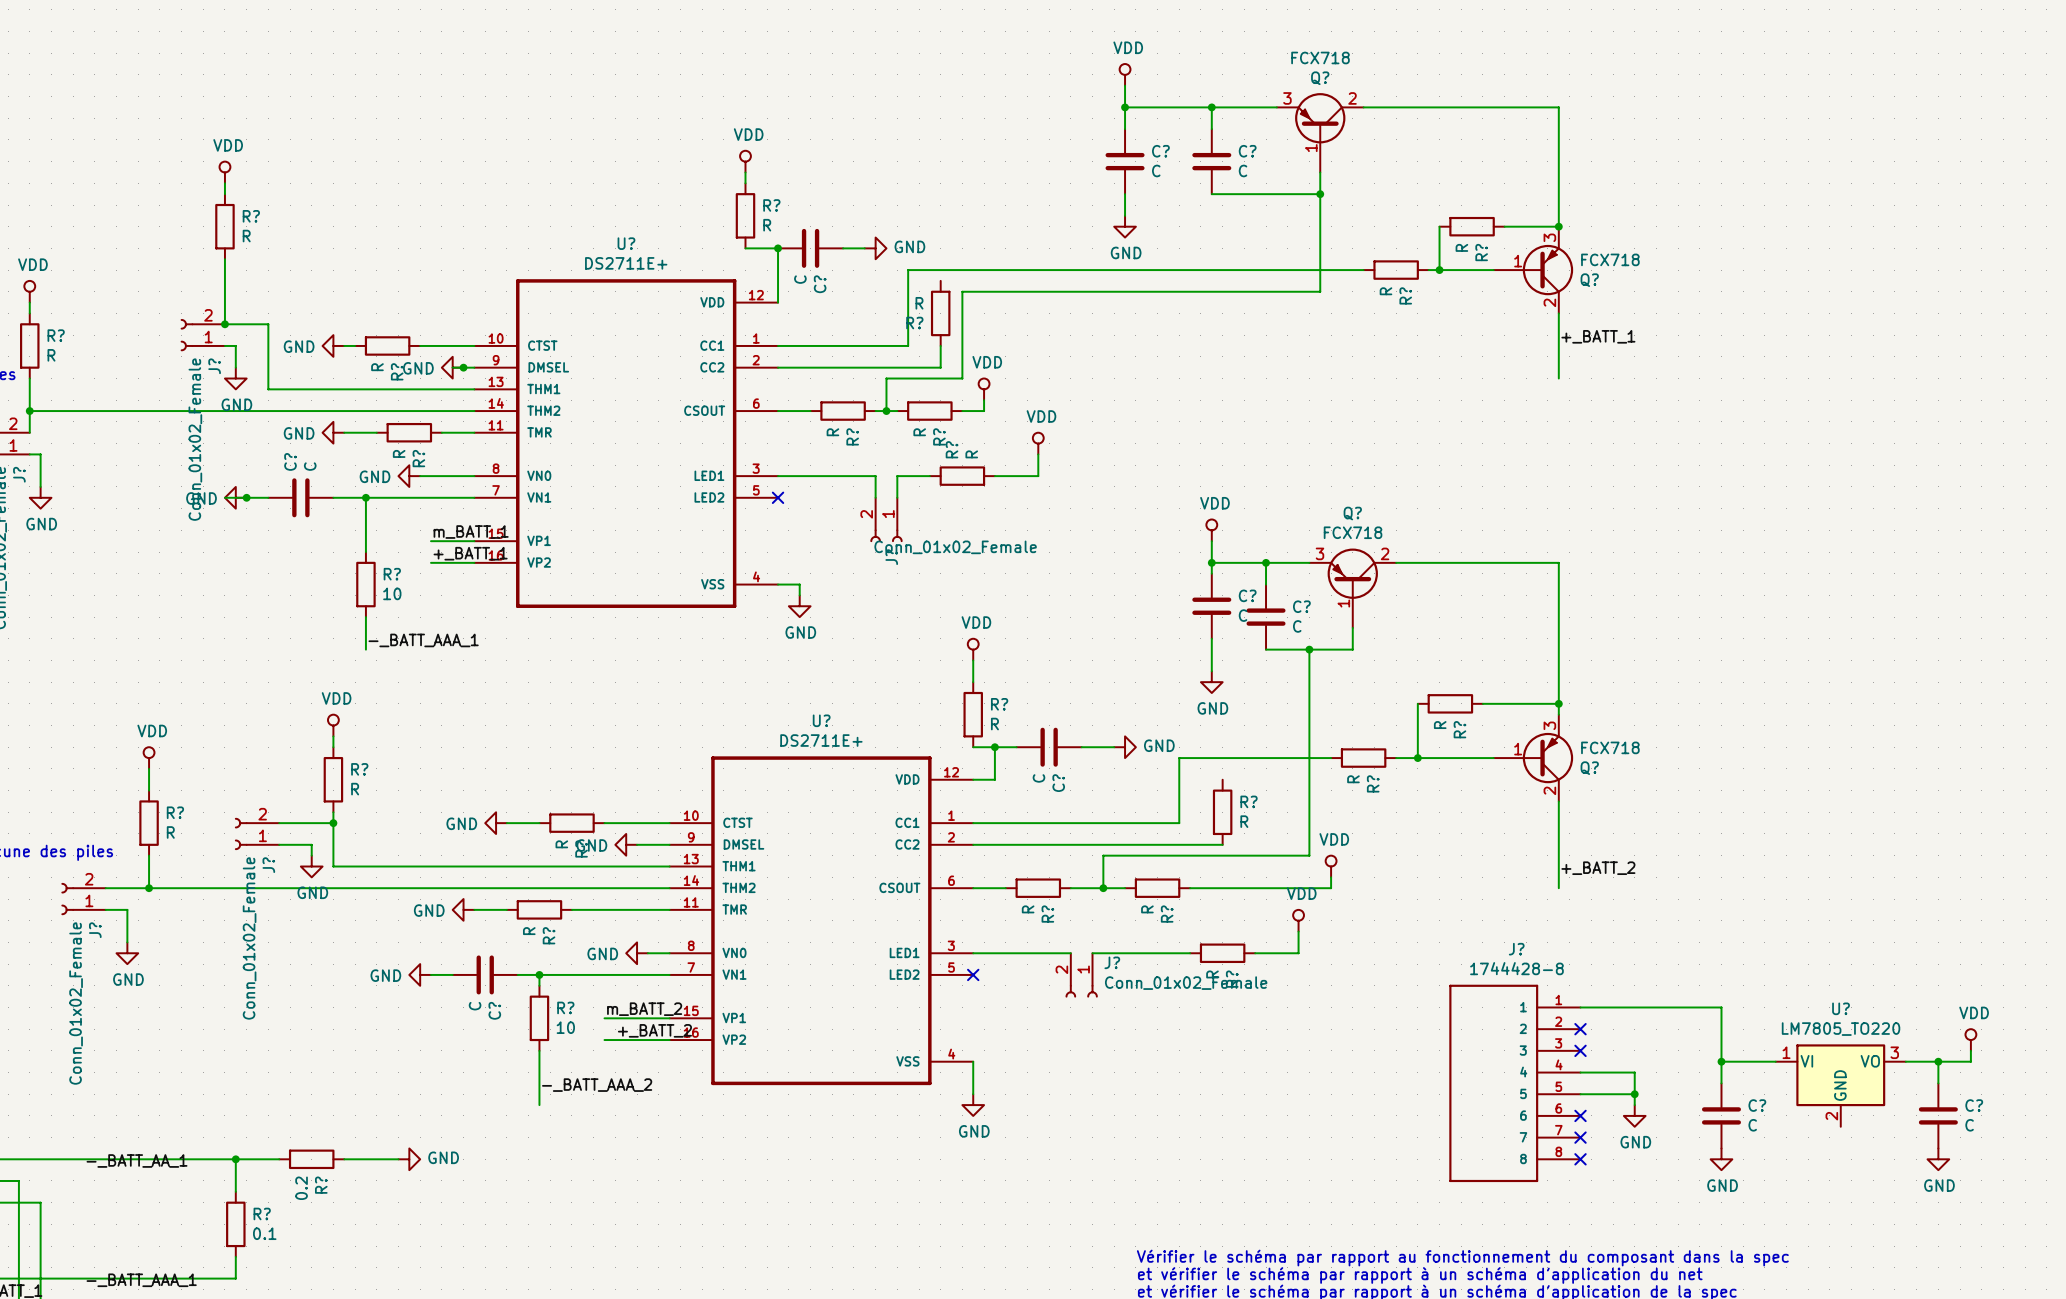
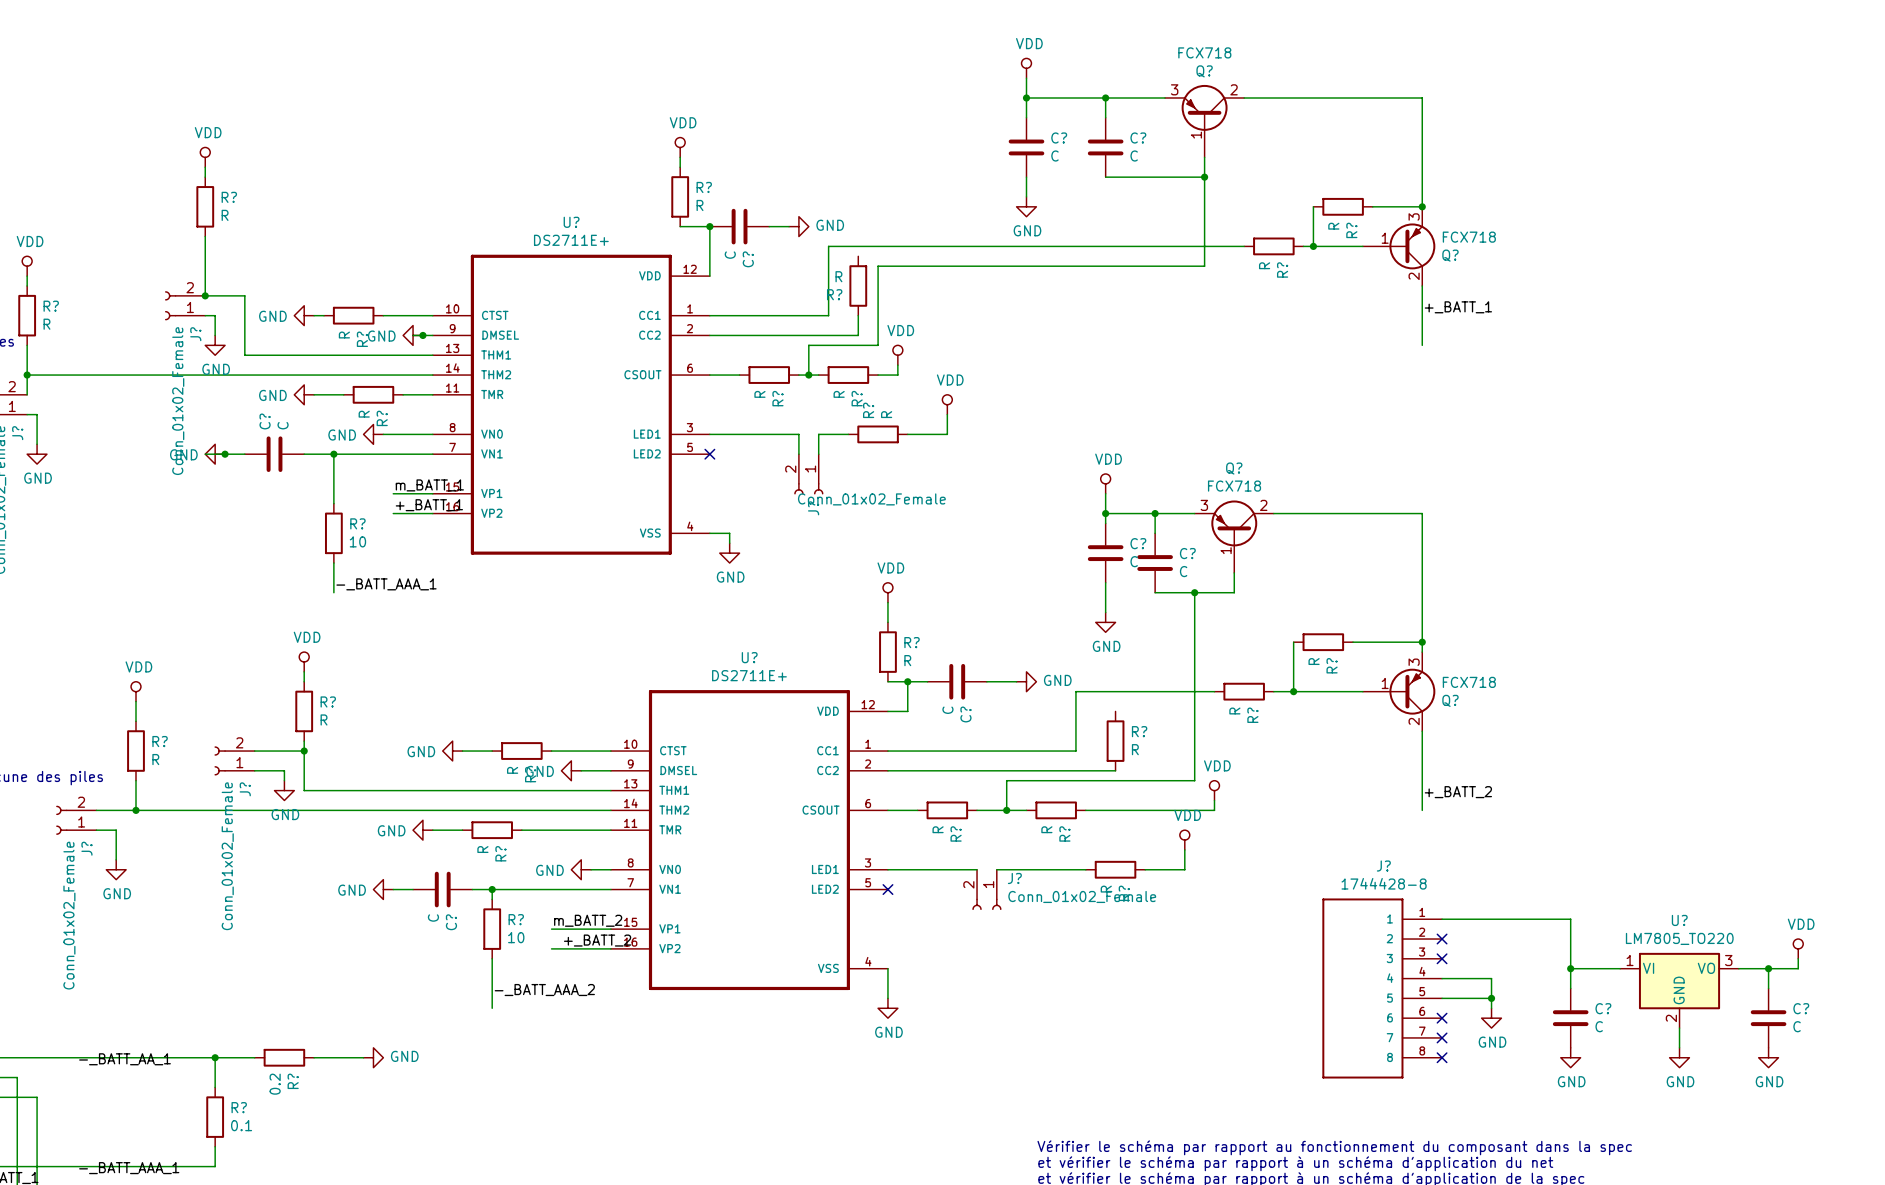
wire: none -> (1679, 1028) (1679, 1047)
power symbol: none -> GND (1679, 1057)

